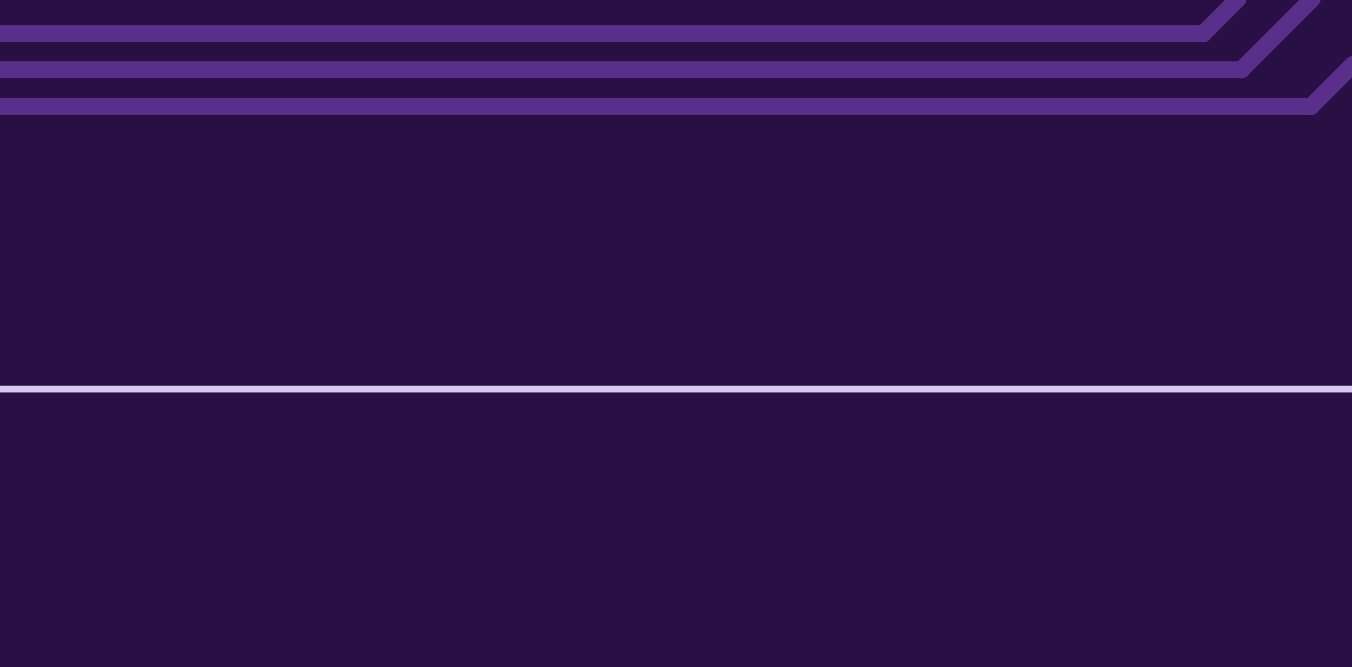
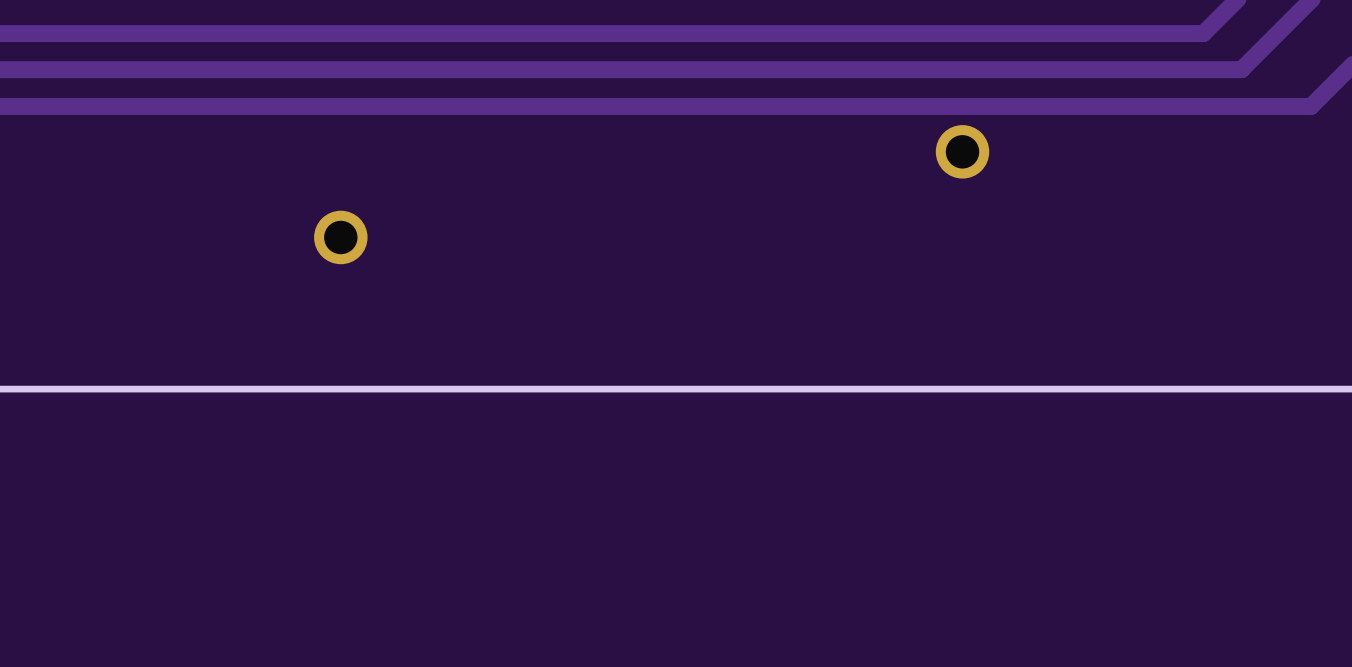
via: none -> (962, 151)
via: none -> (340, 237)

